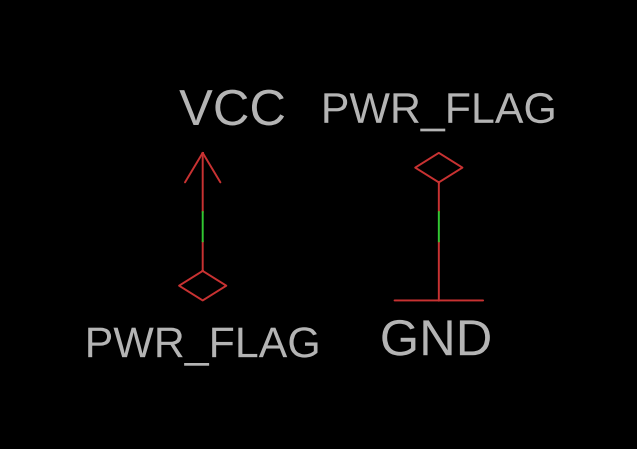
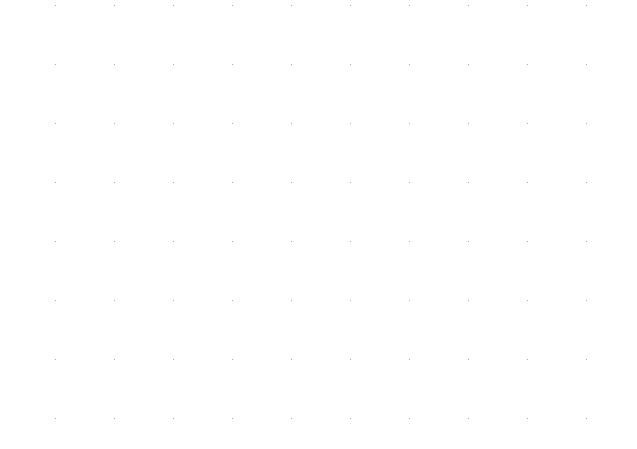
power symbol: VCC (202, 182) -> none
power symbol: PWR_FLAG (438, 182) -> none
wire: (202, 211) (202, 241) -> none
wire: (438, 211) (438, 241) -> none
power symbol: PWR_FLAG (202, 270) -> none
power symbol: GND (438, 270) -> none

